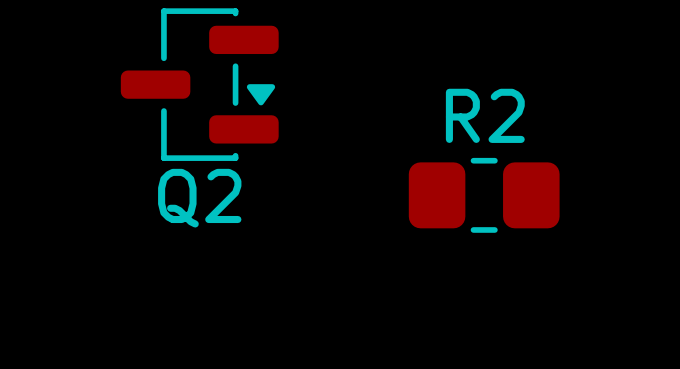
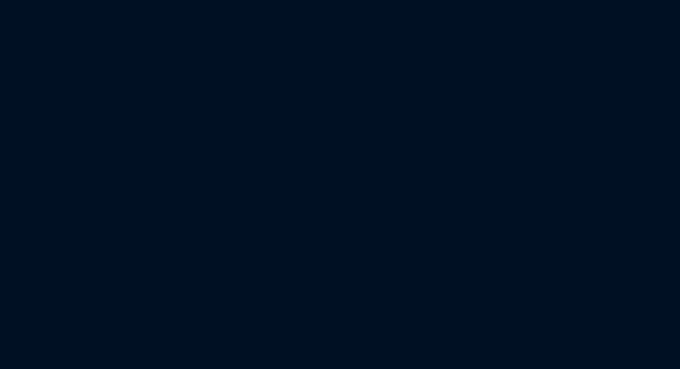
Q2: (199, 84) -> none
R2: (484, 195) -> none

